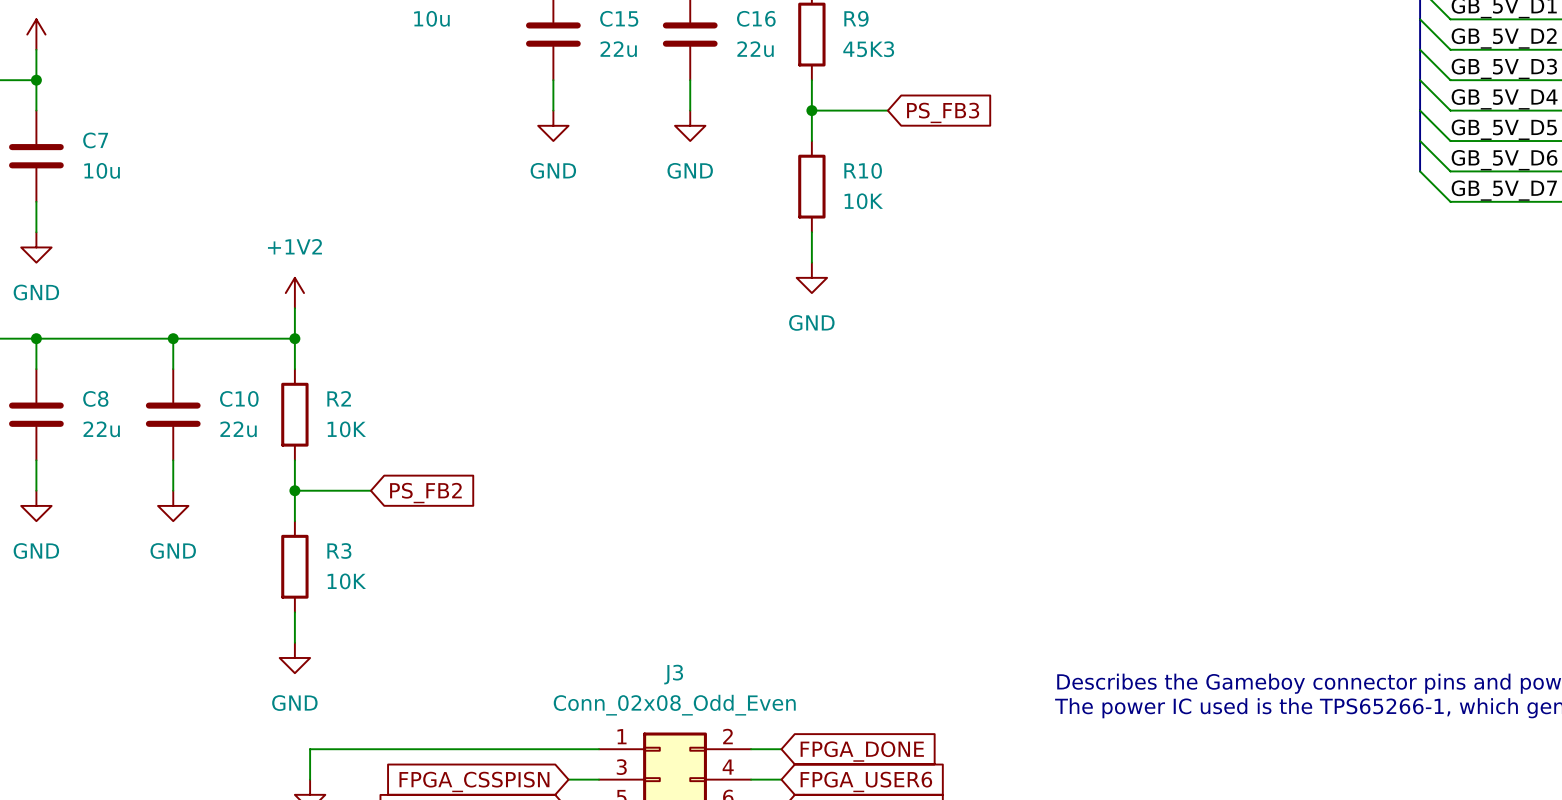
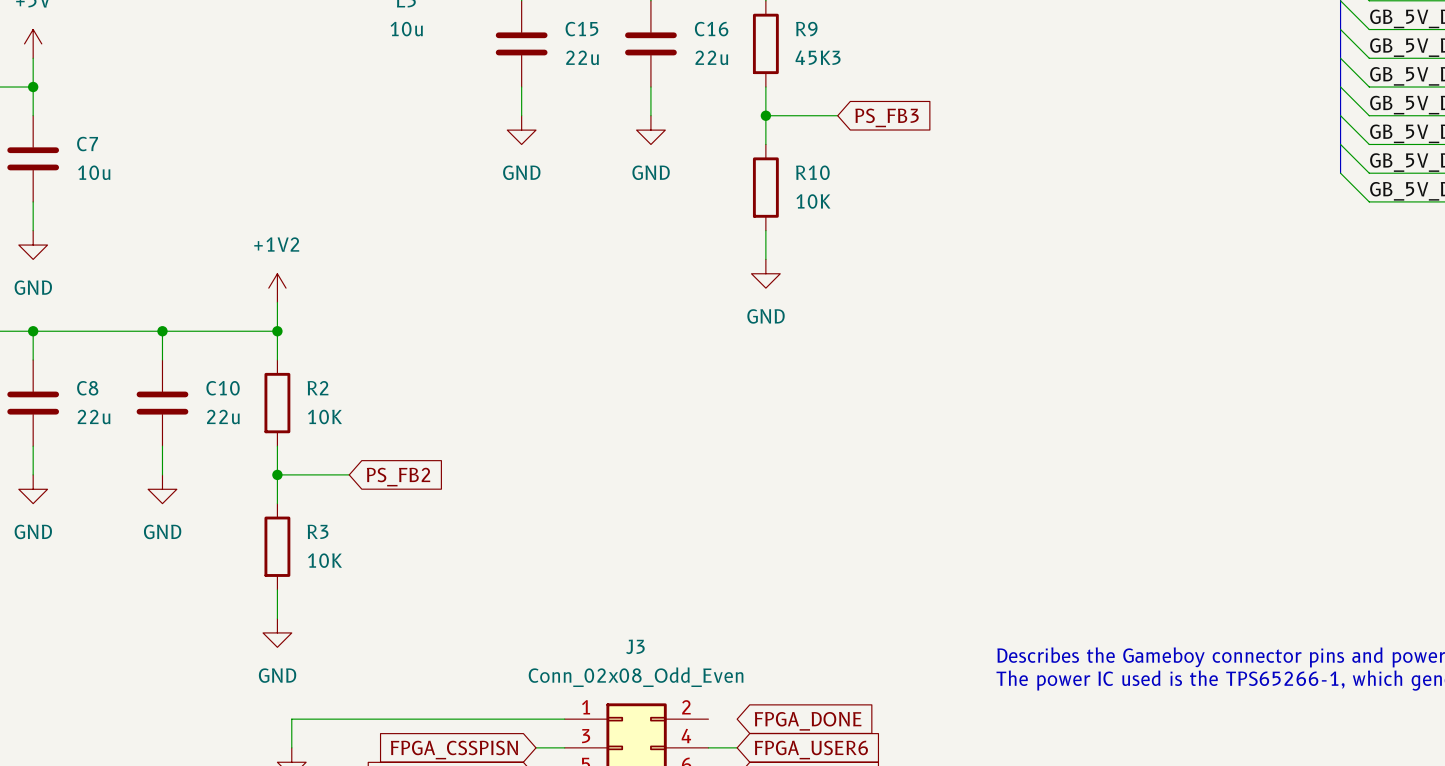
wire: (751, 749) (781, 749) -> none

